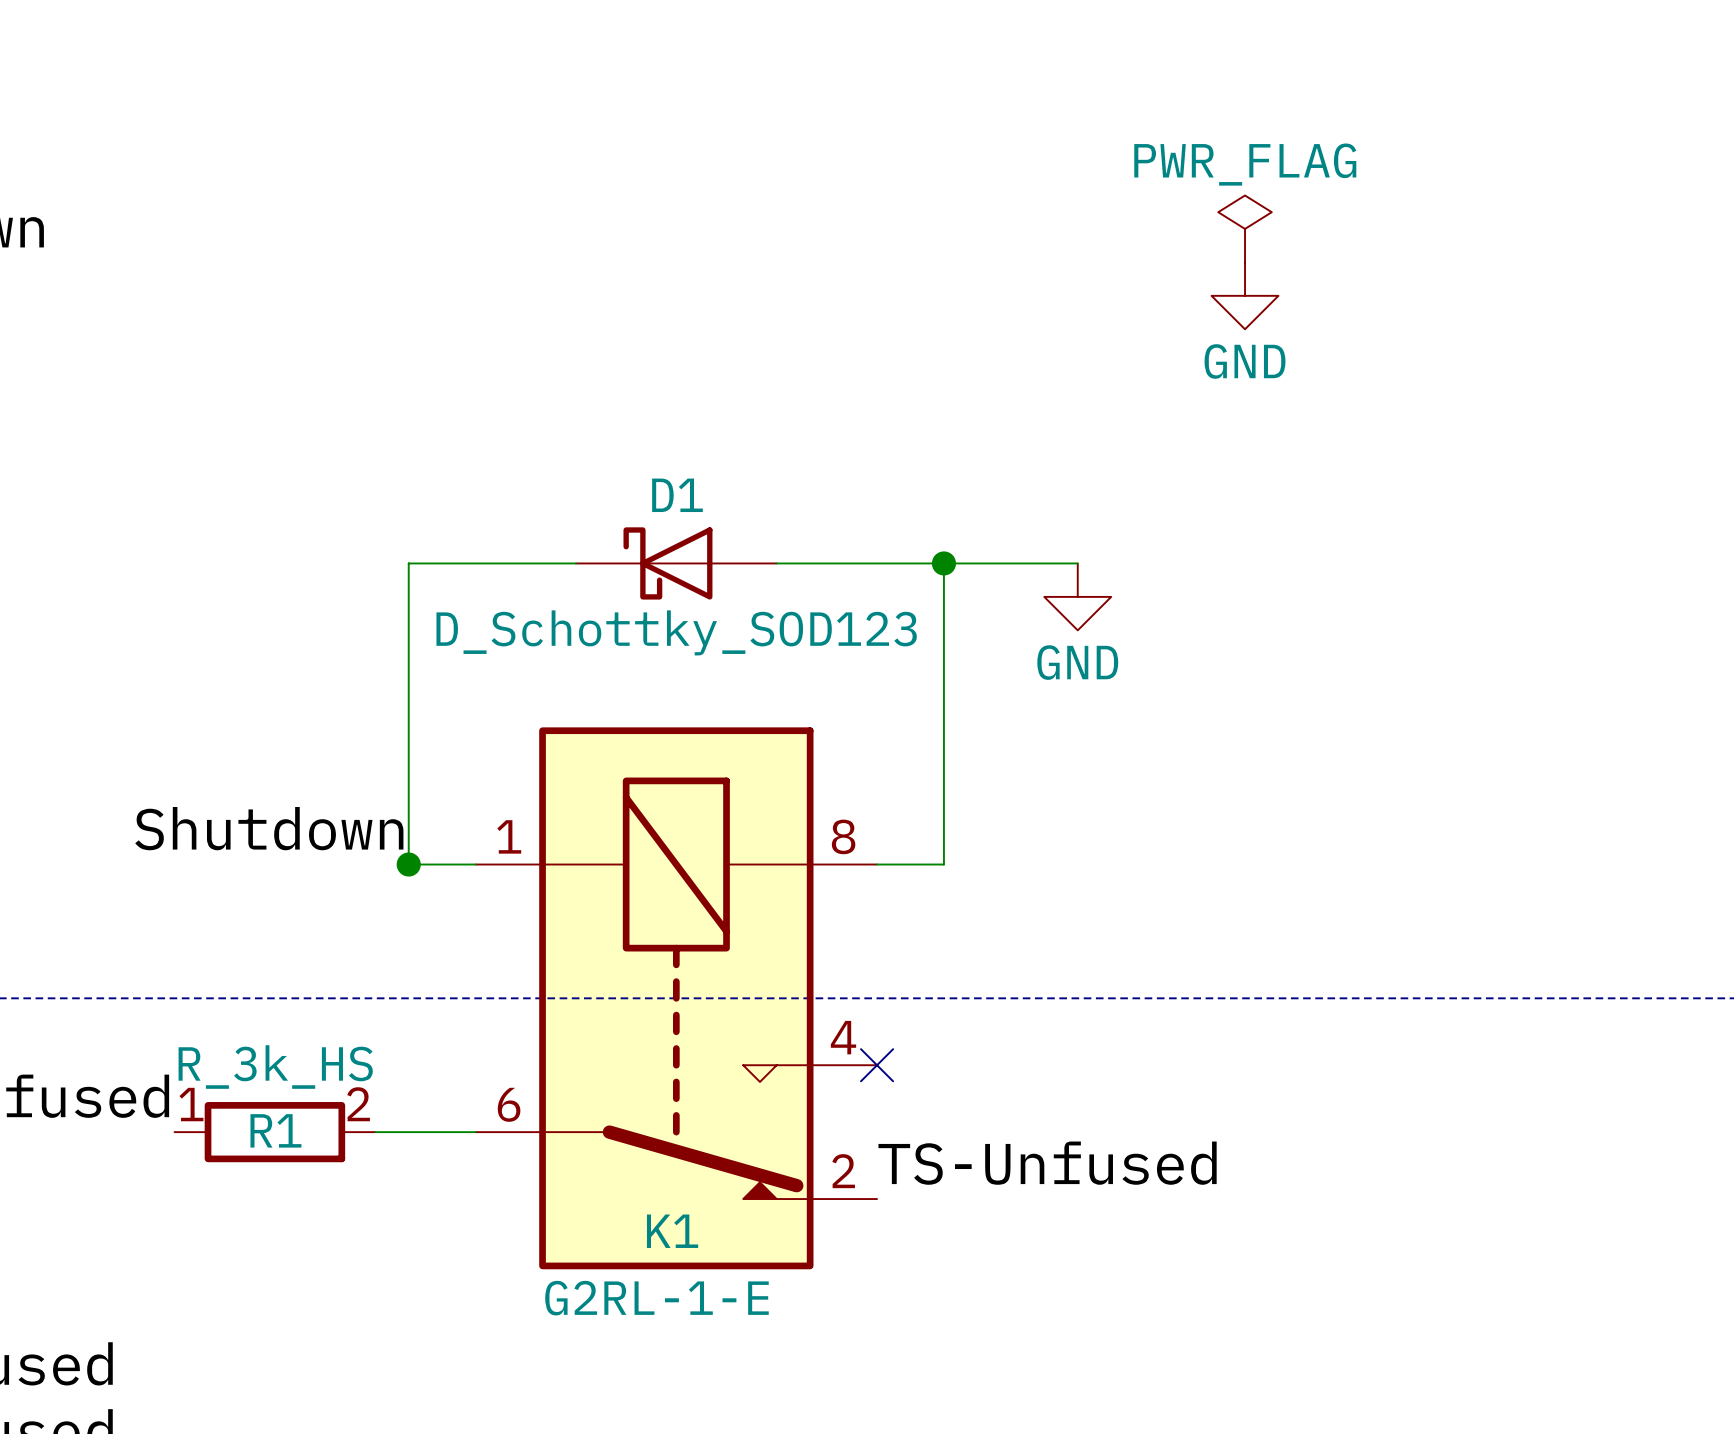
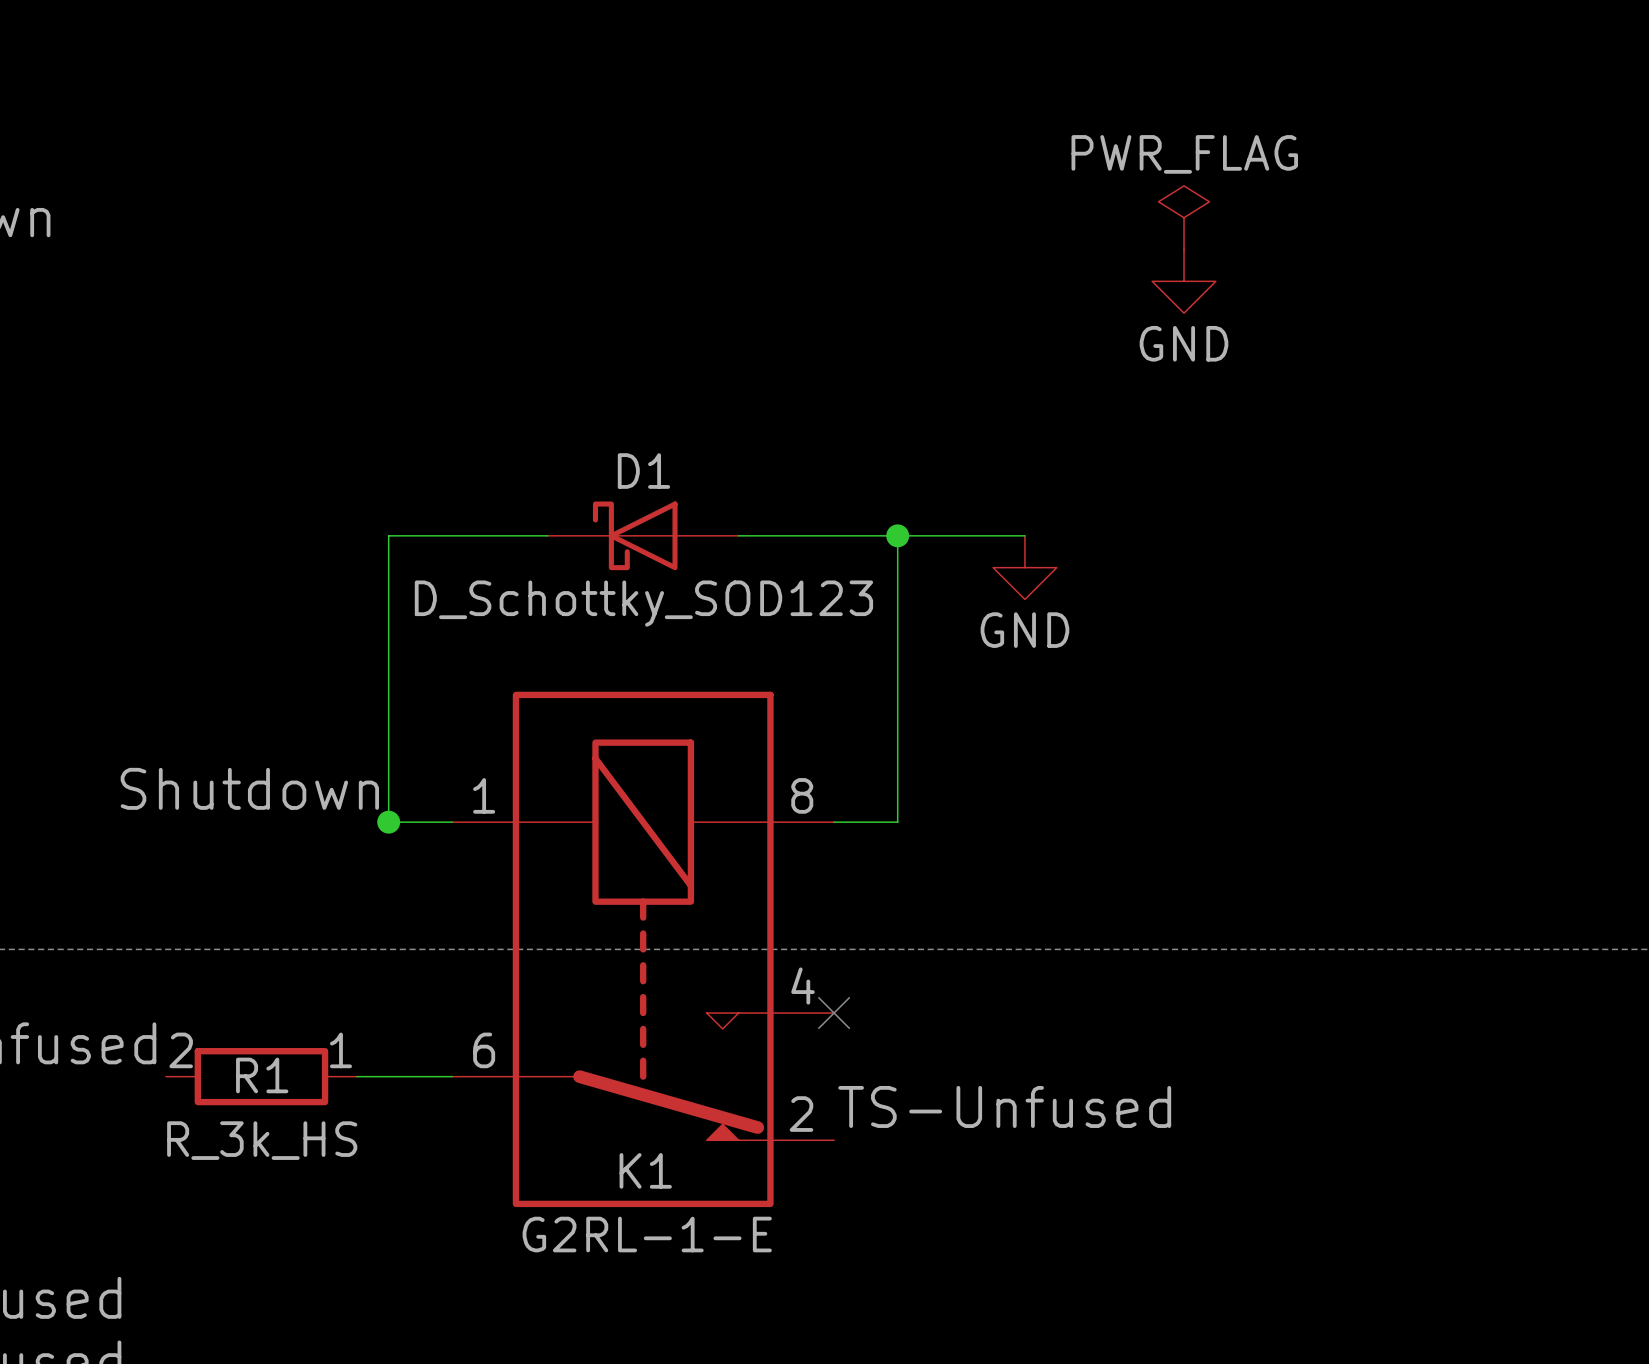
R1 rotation: 0° (274, 1132) -> 180° (261, 1076)

